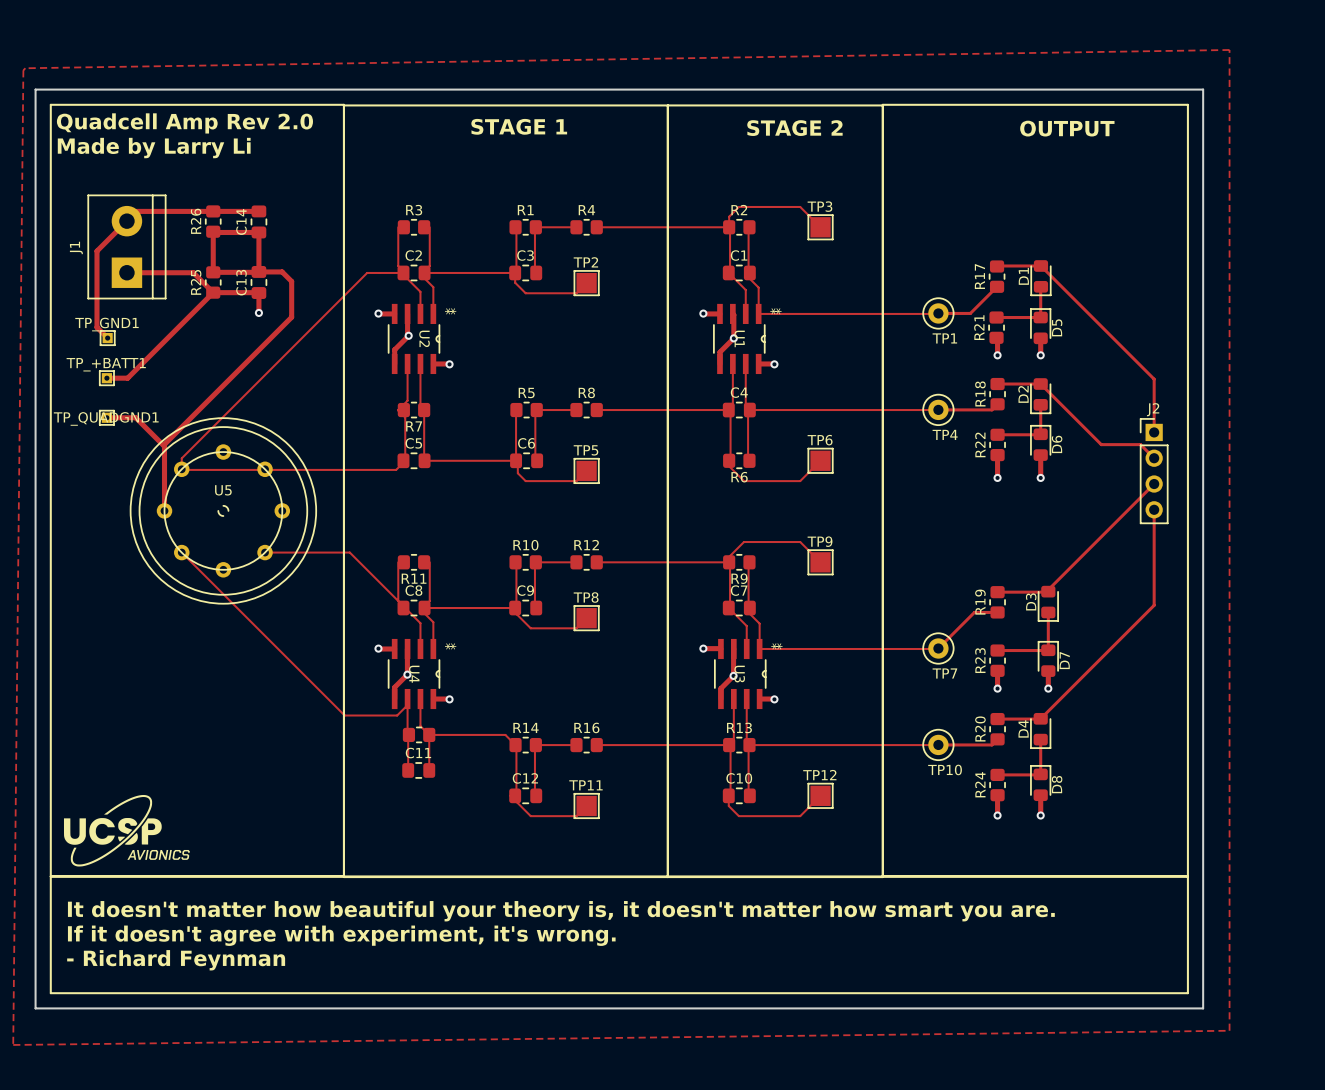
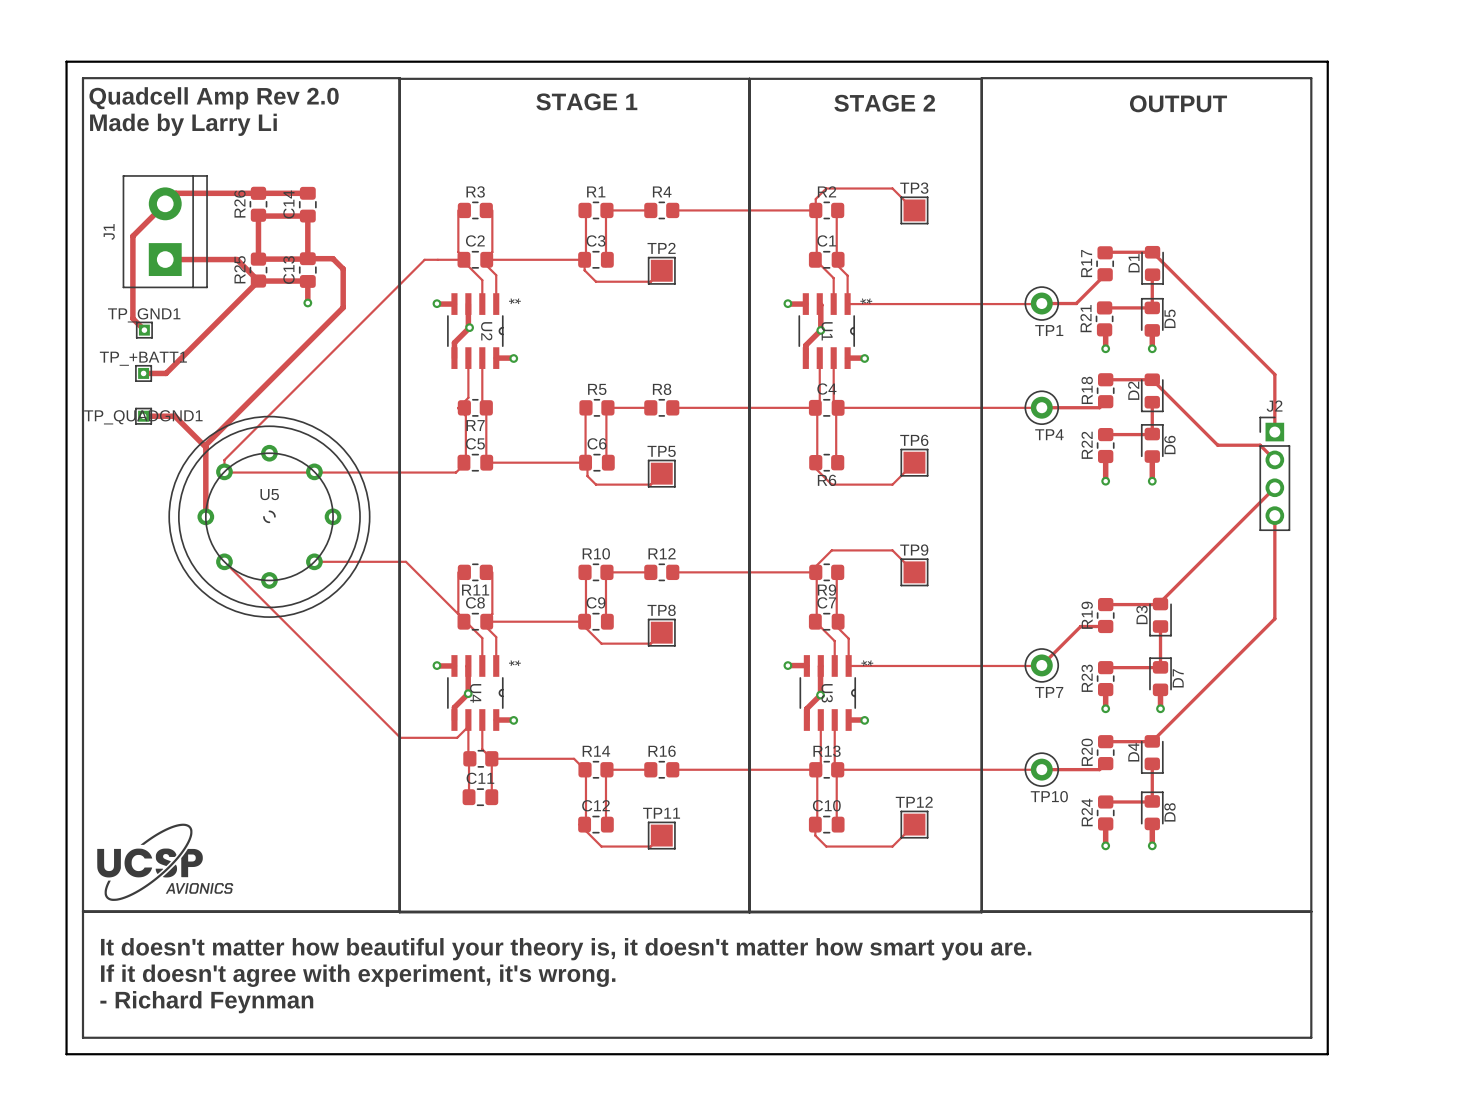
zone outline: (1229, 49) (1229, 1030) (13, 1044) (23, 70) (25, 68) (1229, 49) -> none

